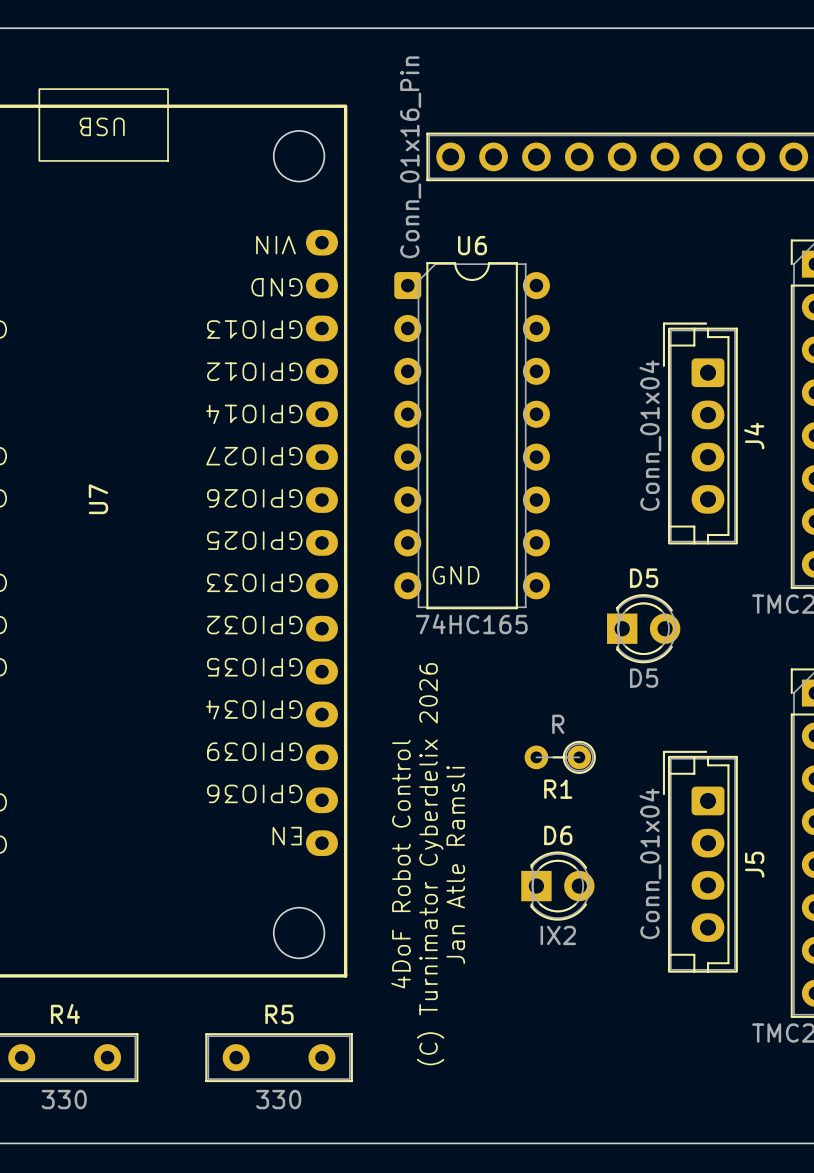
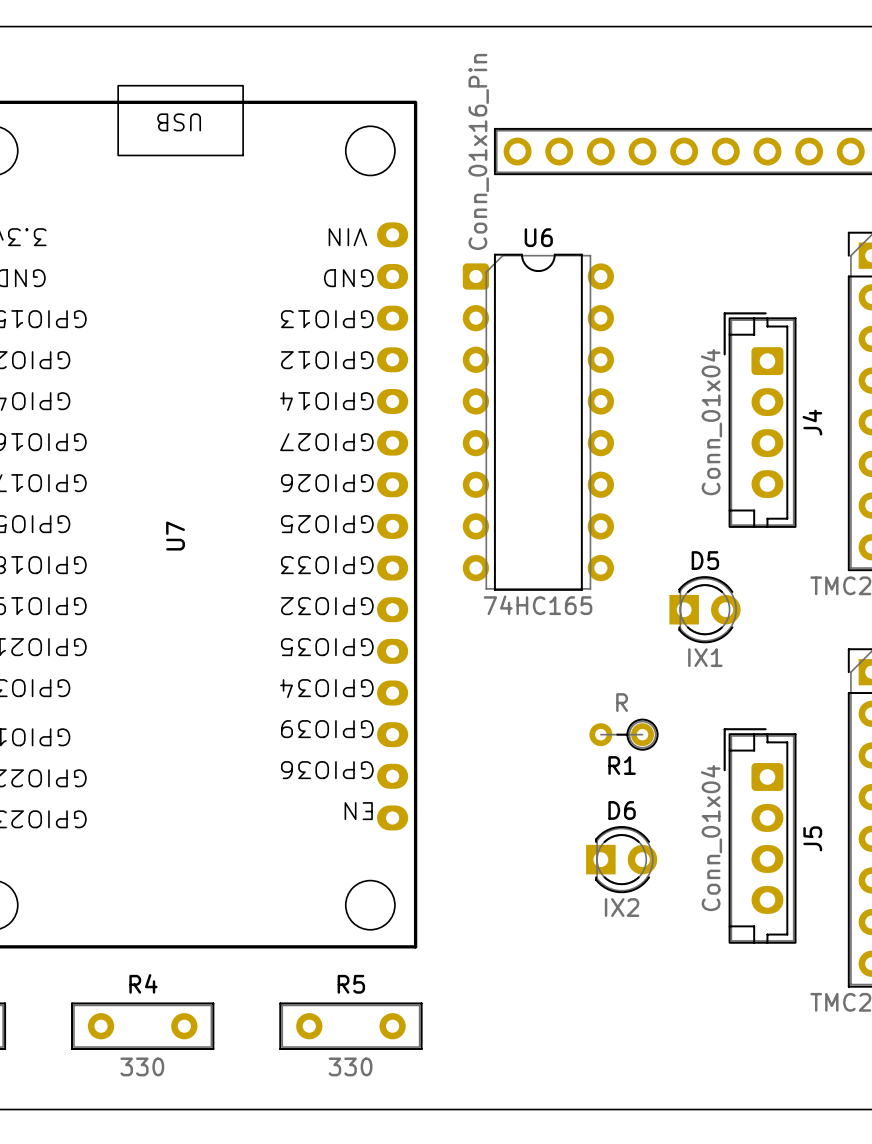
U7 name position: U7 (98, 499) -> U7 (175, 536)
text: GND (456, 575) -> none
D5 value: D5 (644, 678) -> IX1 (705, 657)
text: 4DoF Robot Control (400, 864) -> none
text: (C) Turnimator Cyberdelix 2026 (430, 864) -> none
text: Jan Atle Ramsli (455, 865) -> none

